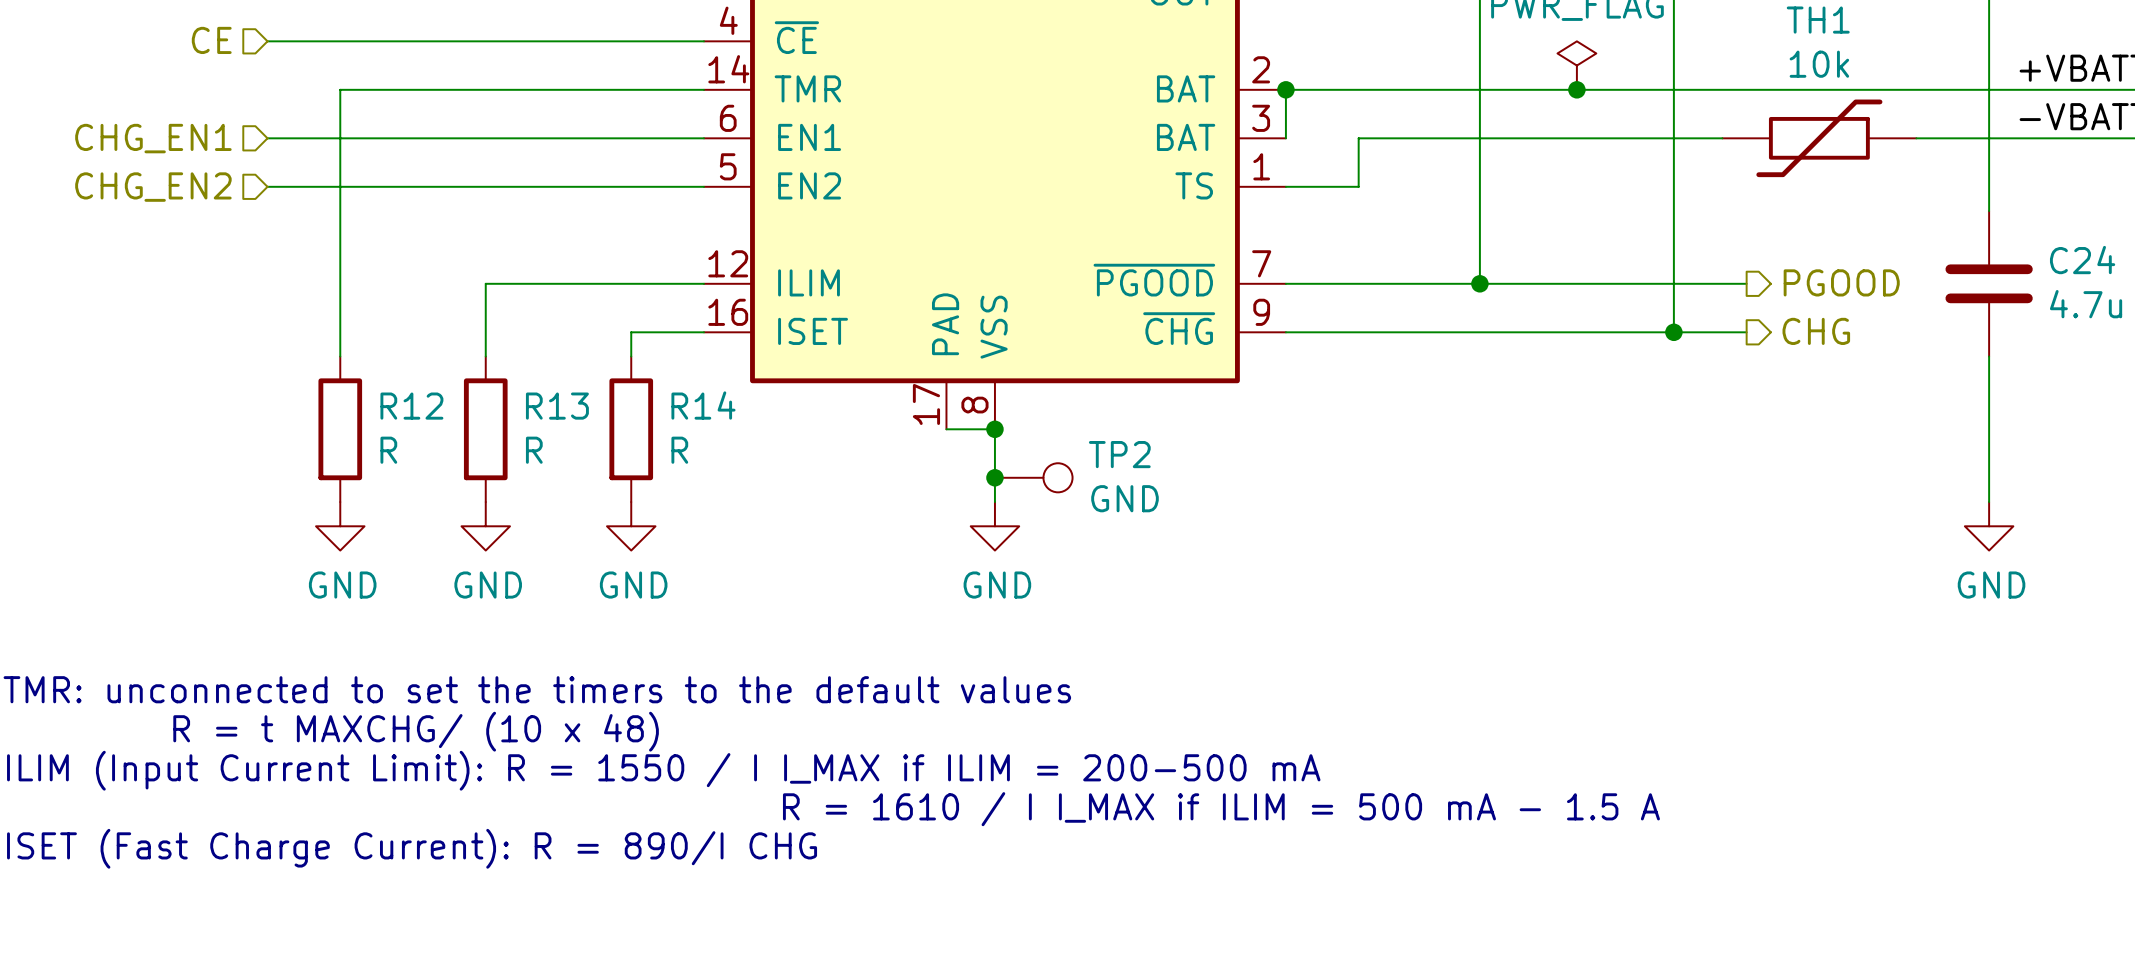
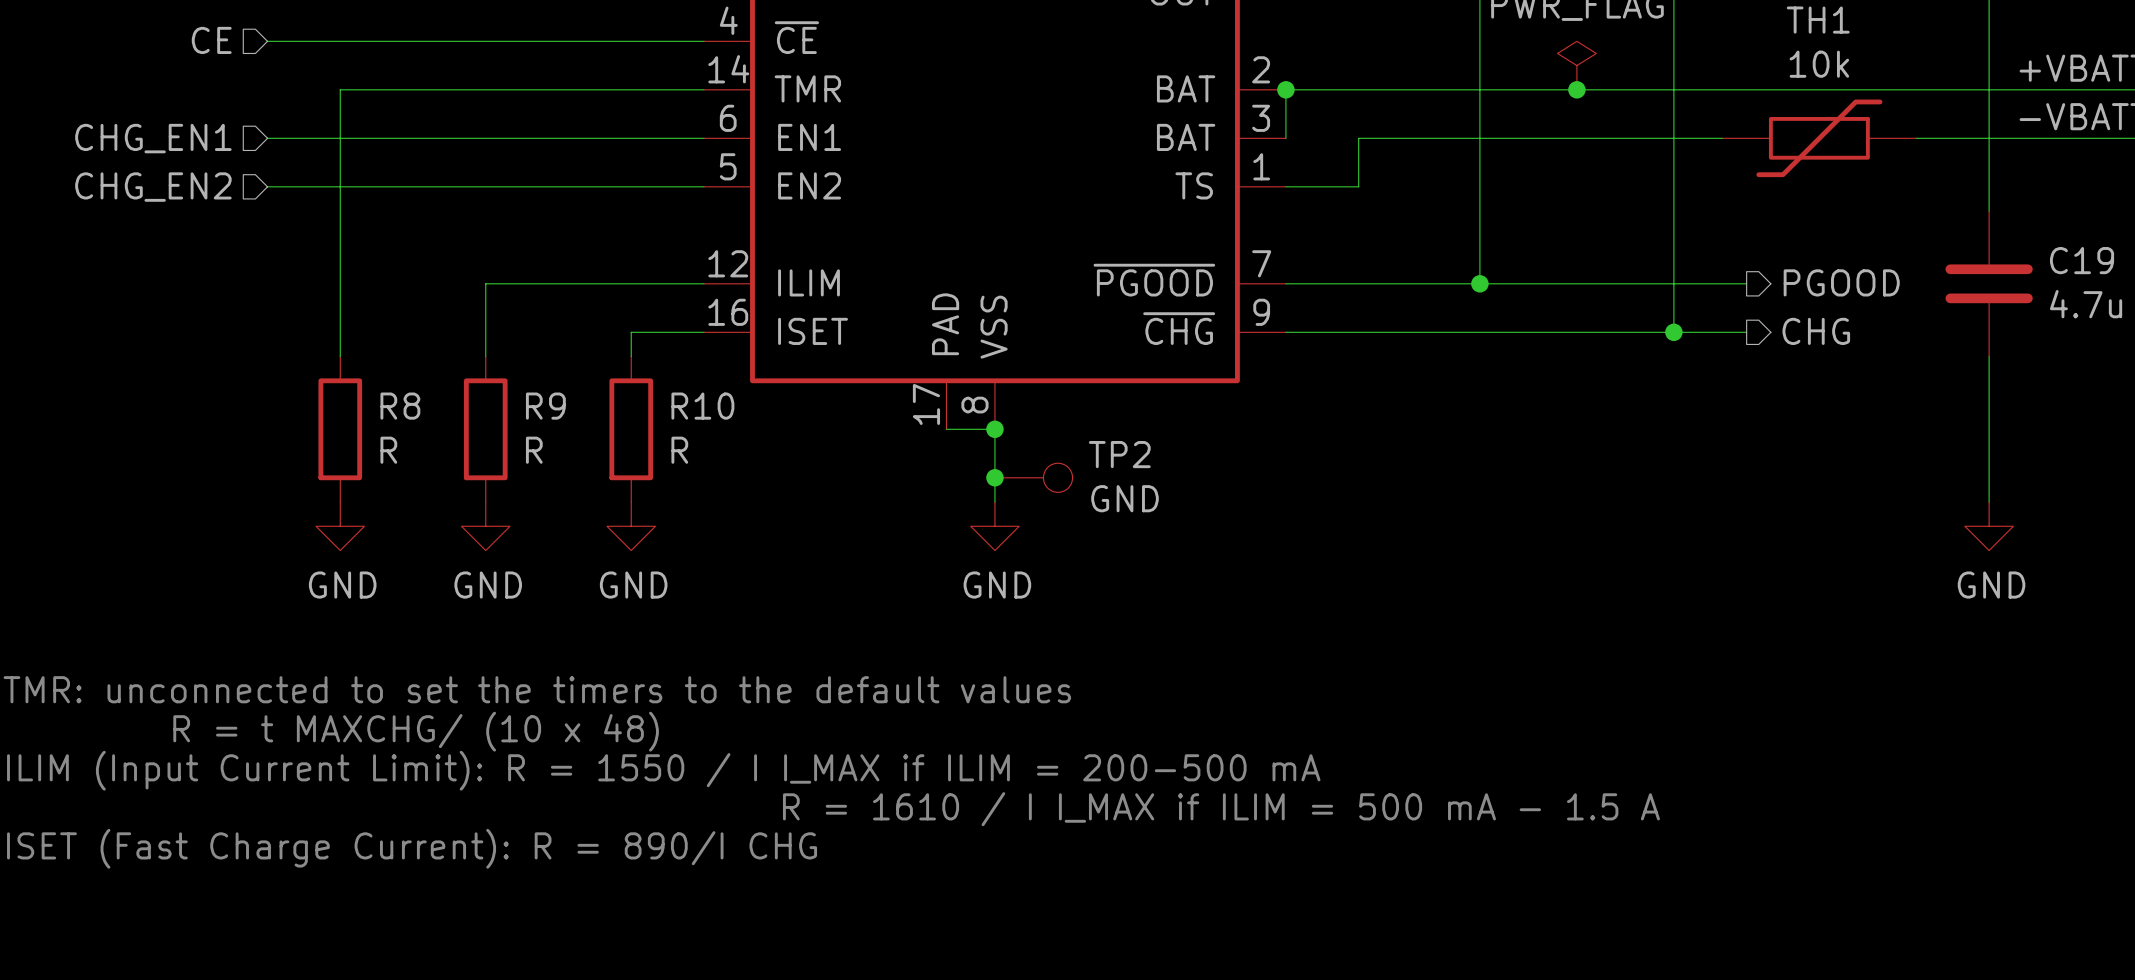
C24 name: C24 (2082, 260) -> C19 (2082, 260)
R14 name: R14 (703, 405) -> R10 (702, 406)
R12 name: R12 (411, 406) -> R8 (400, 406)
R13 name: R13 (557, 406) -> R9 (545, 406)

